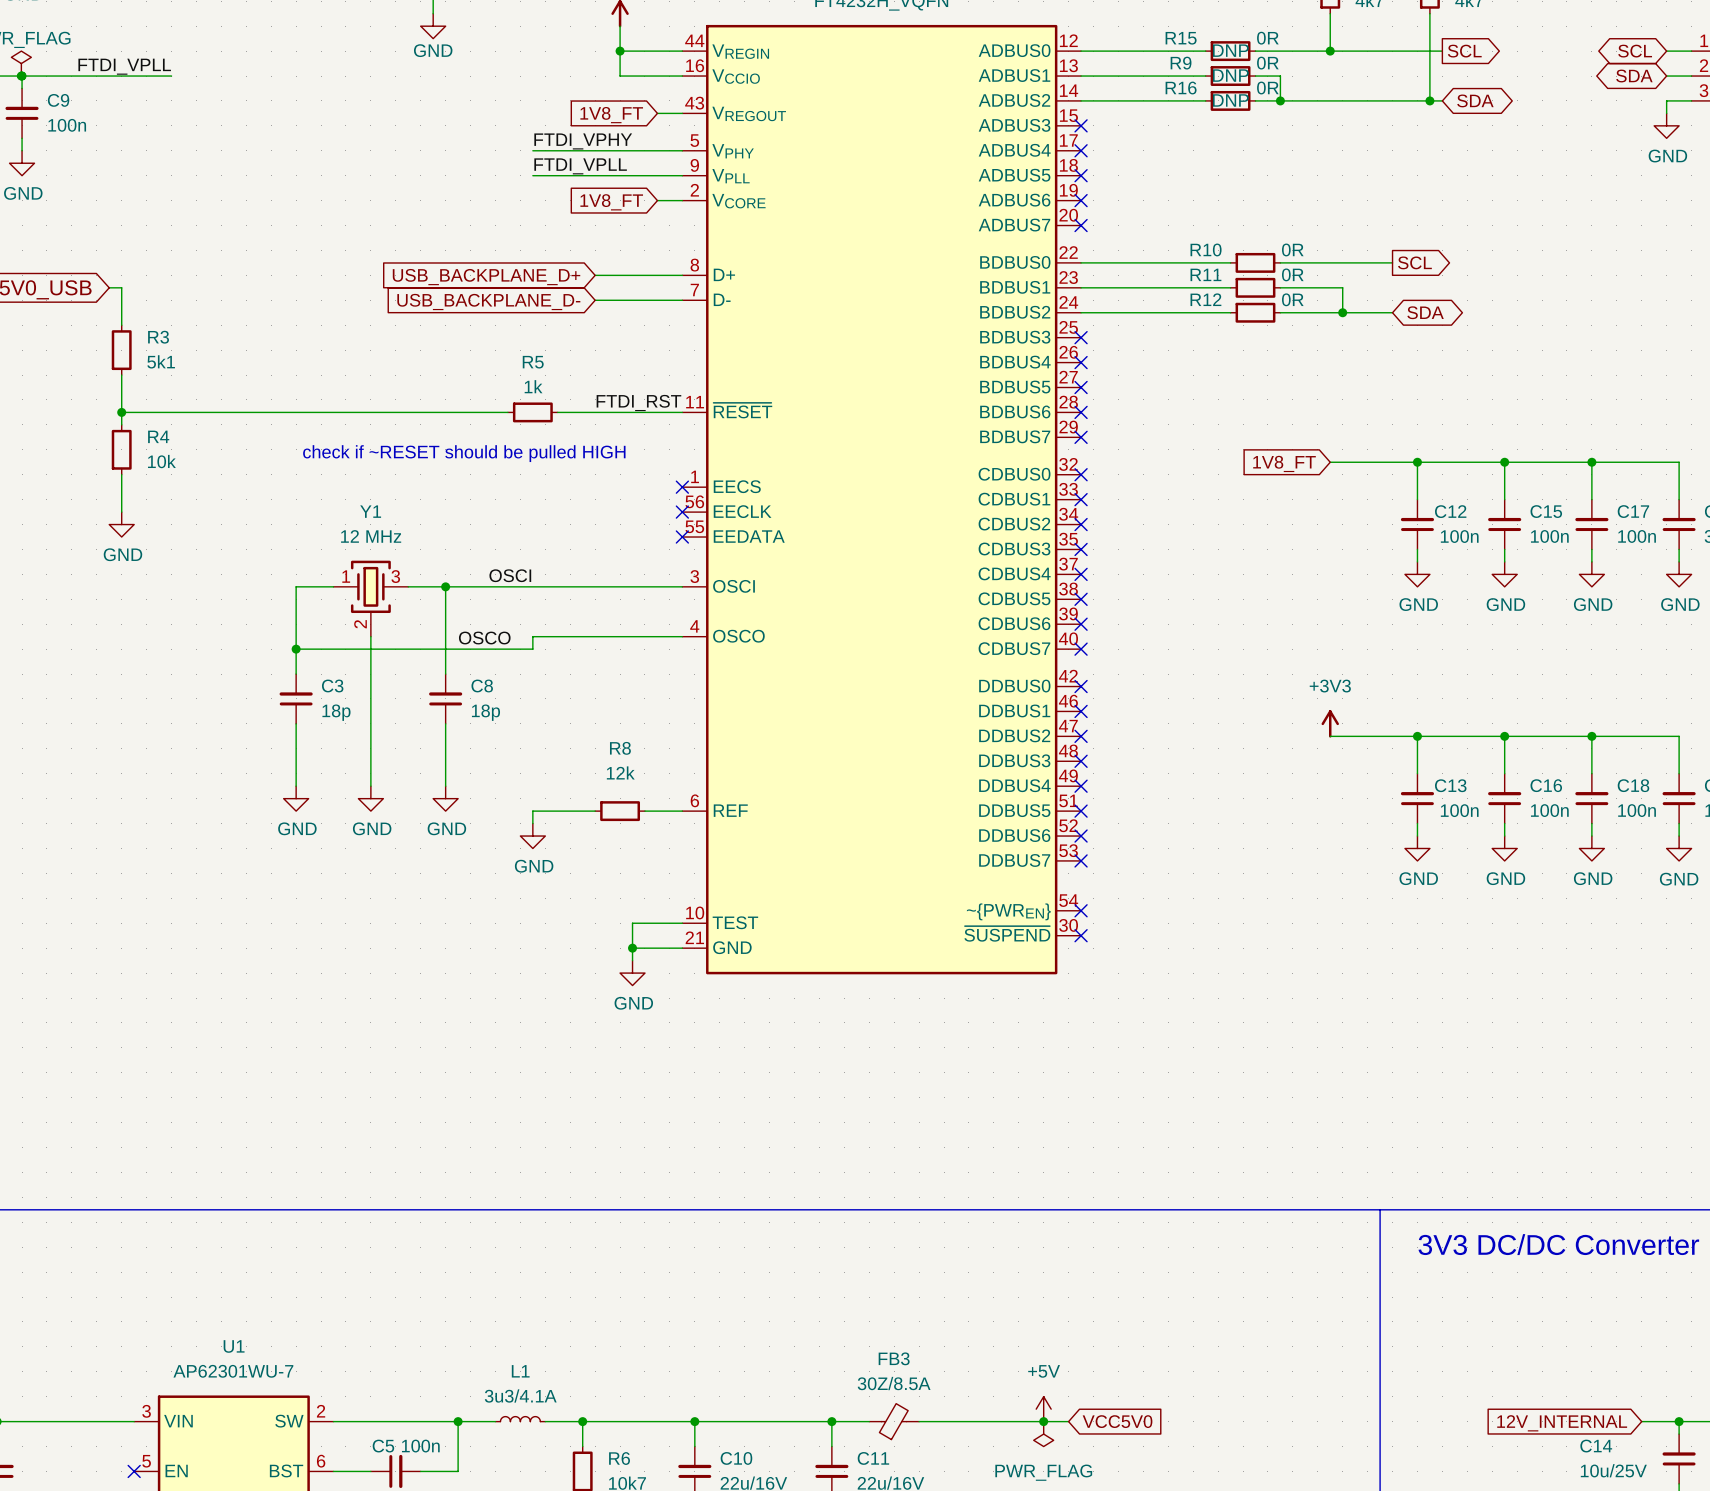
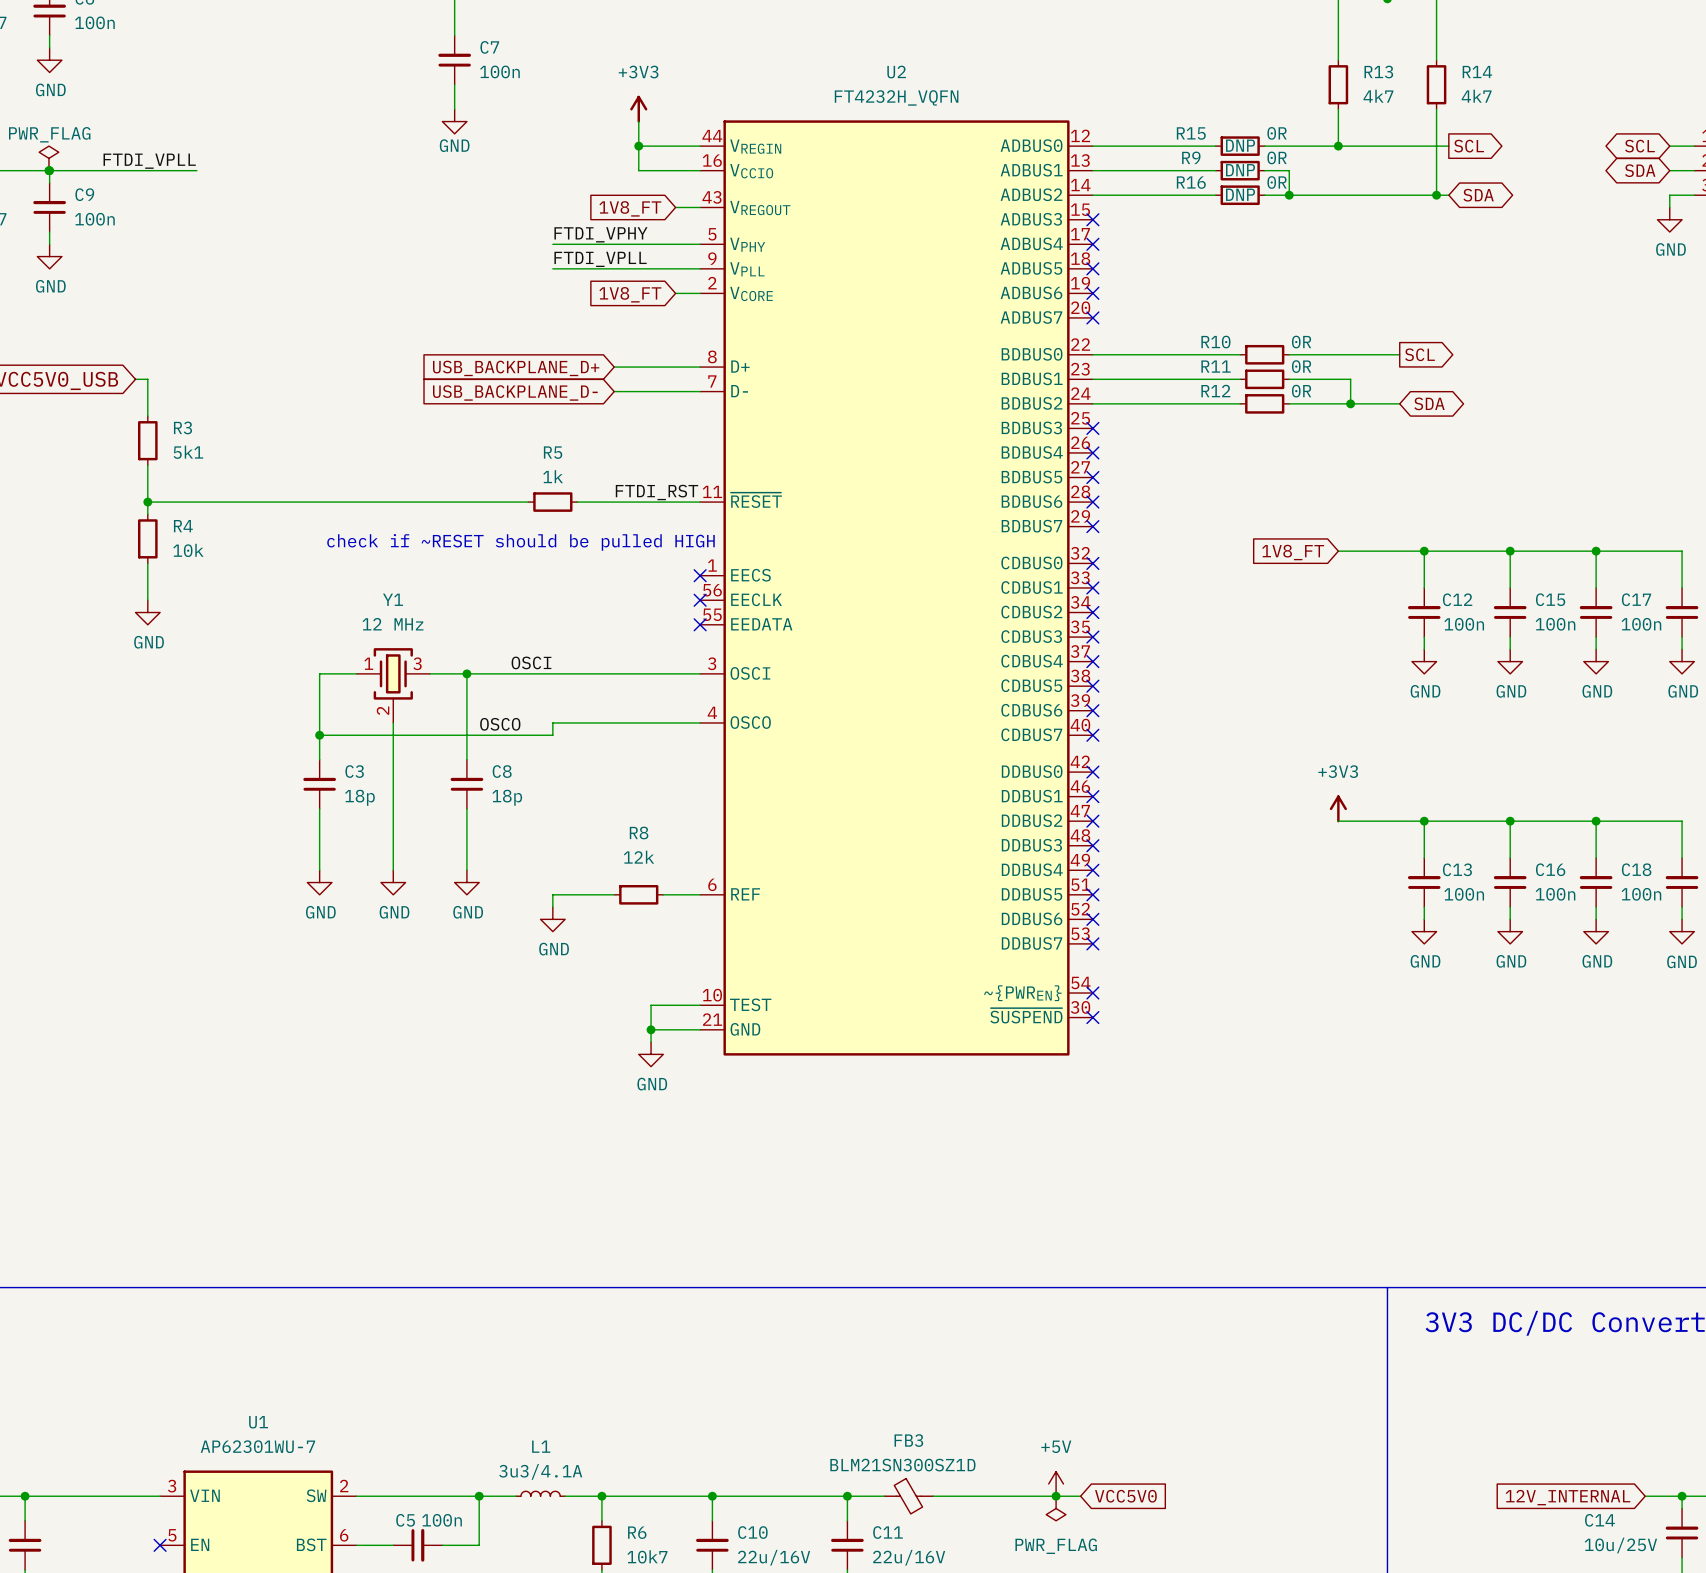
FB3 text: 30Z/8.5A (894, 1383) -> none
FB3 value: none -> BLM21SN300SZ1D (902, 1465)
FB3 flip: as is (893, 1421) -> up-down (908, 1496)

